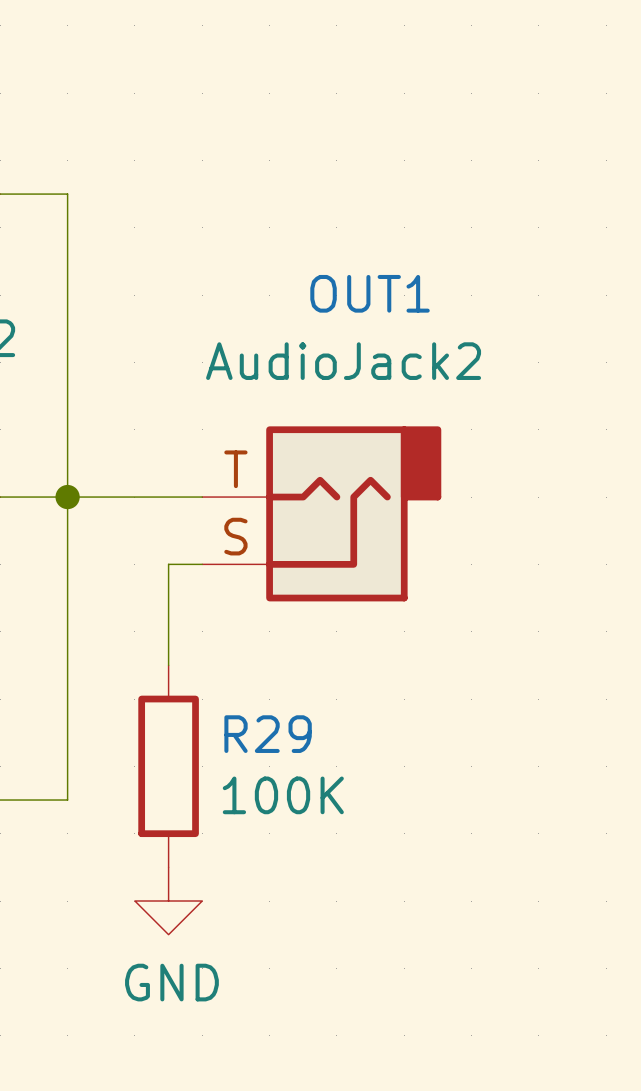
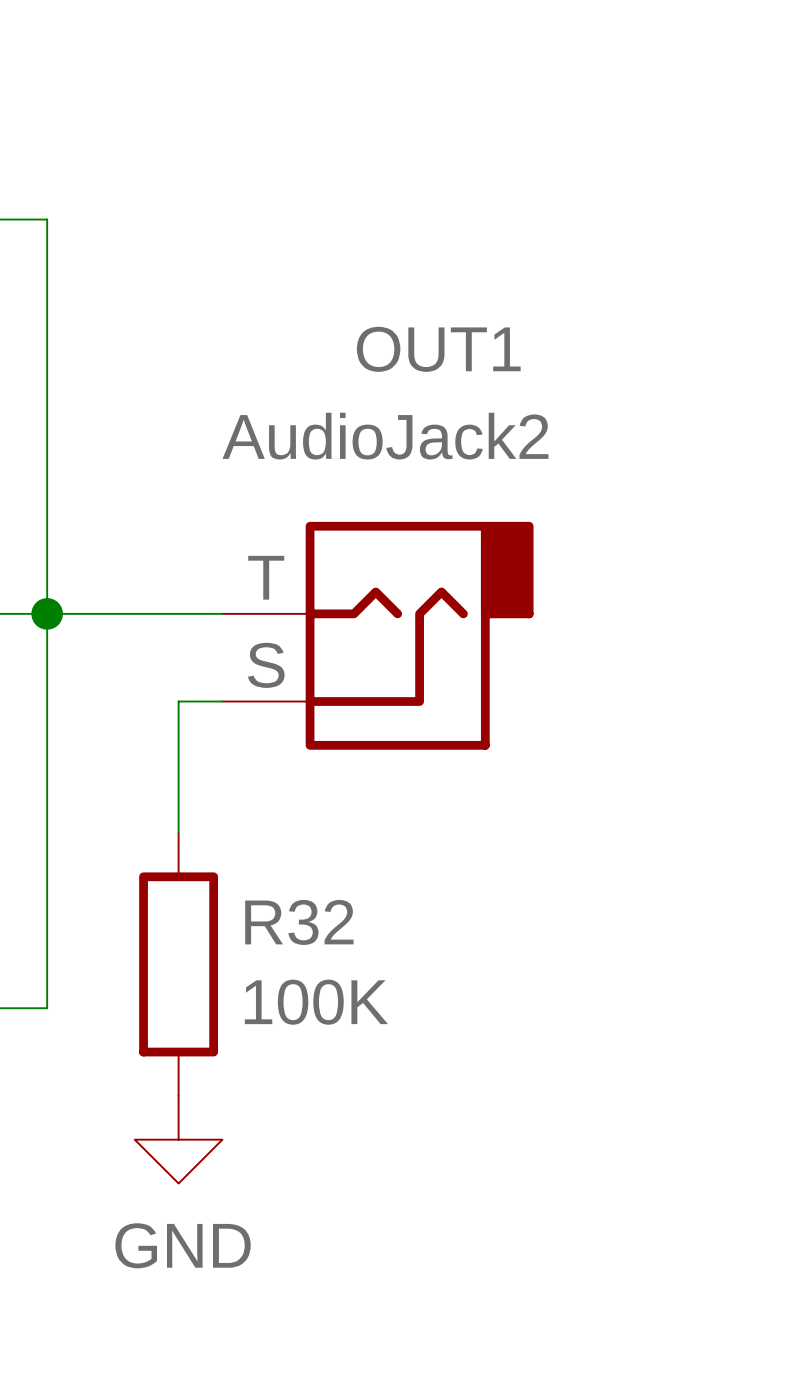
R29 name: R29 (268, 734) -> R32 (299, 922)

